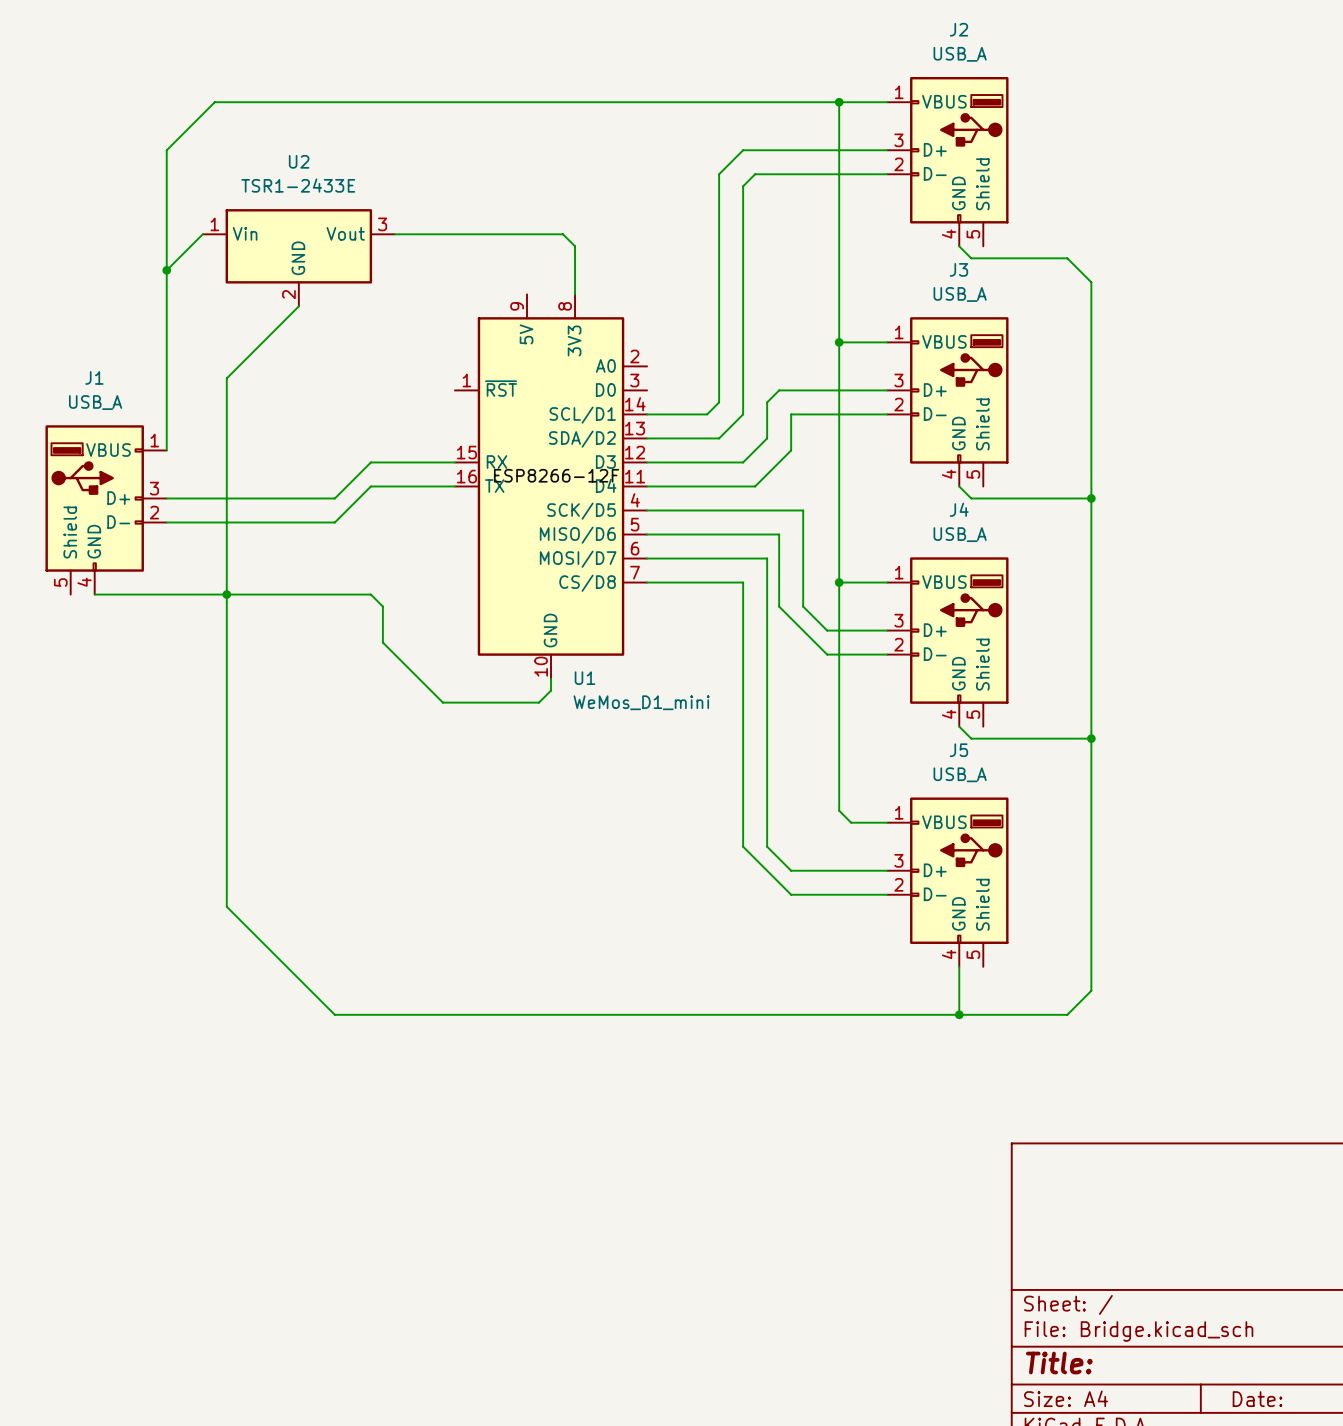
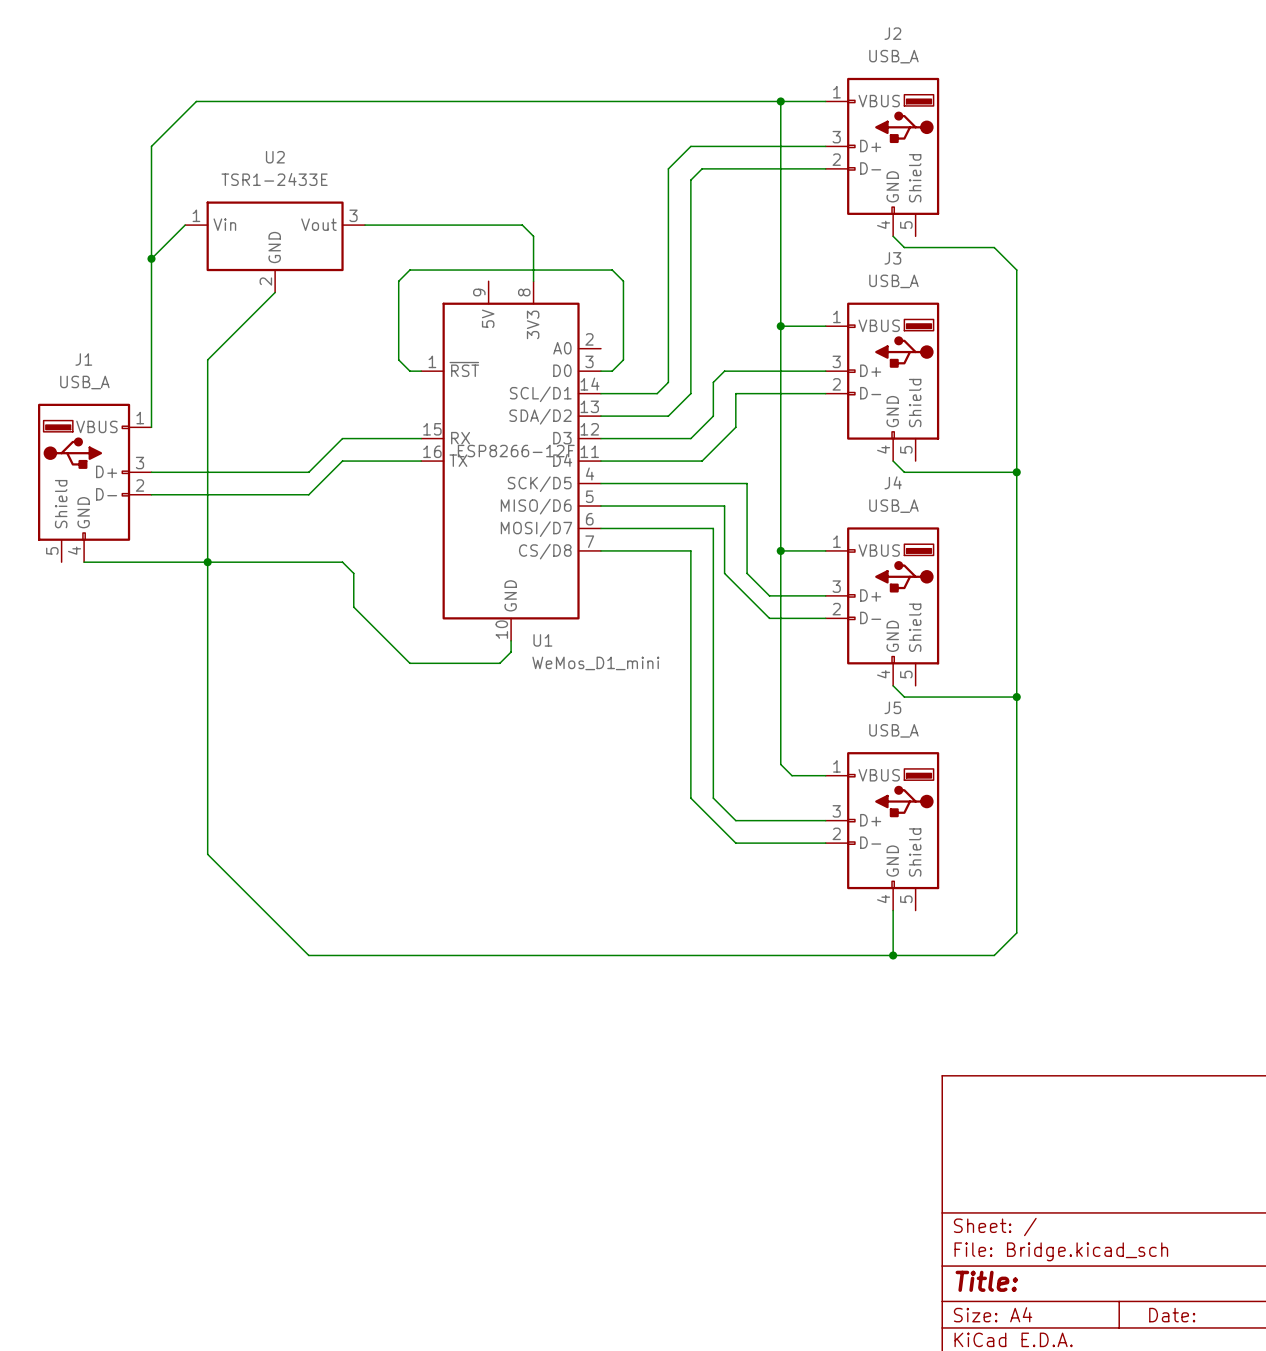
wire: none -> (421, 371) (409, 371) (398, 359) (398, 281) (409, 270) (612, 270) (623, 281) (623, 359) (612, 371) (600, 371)

